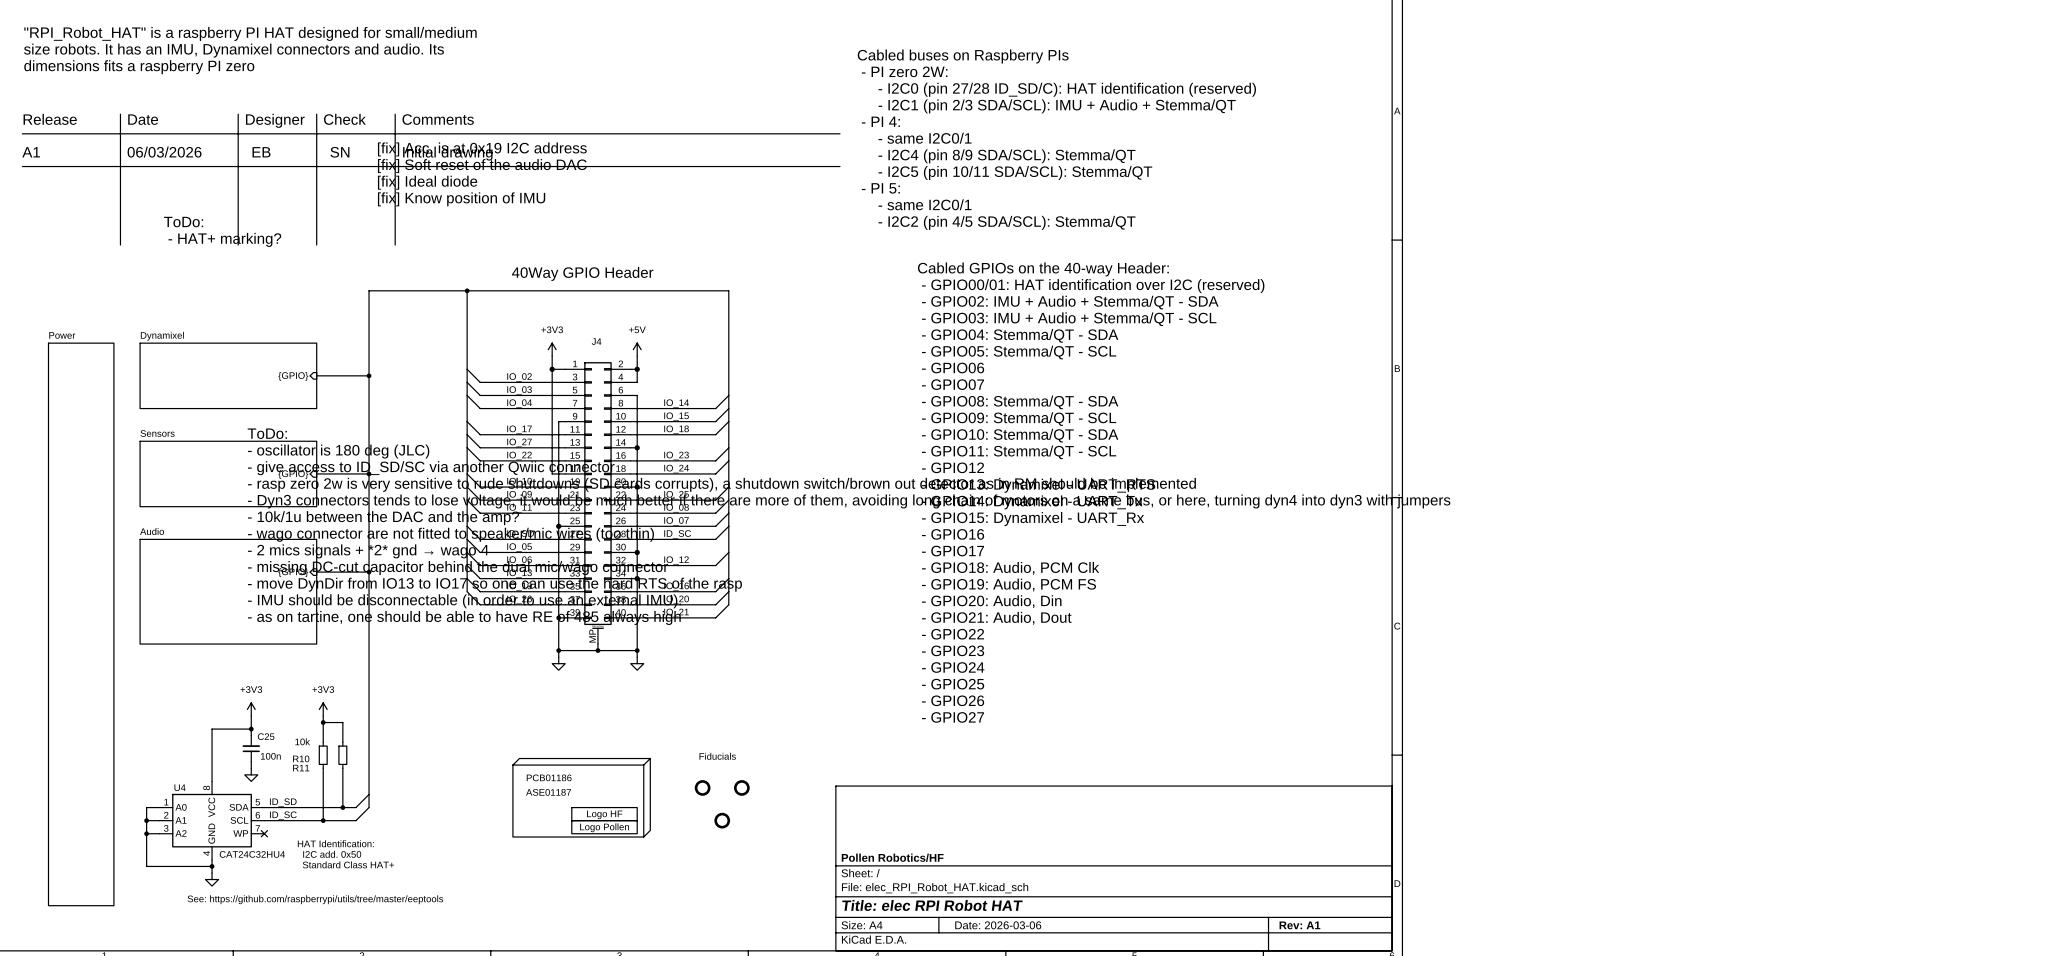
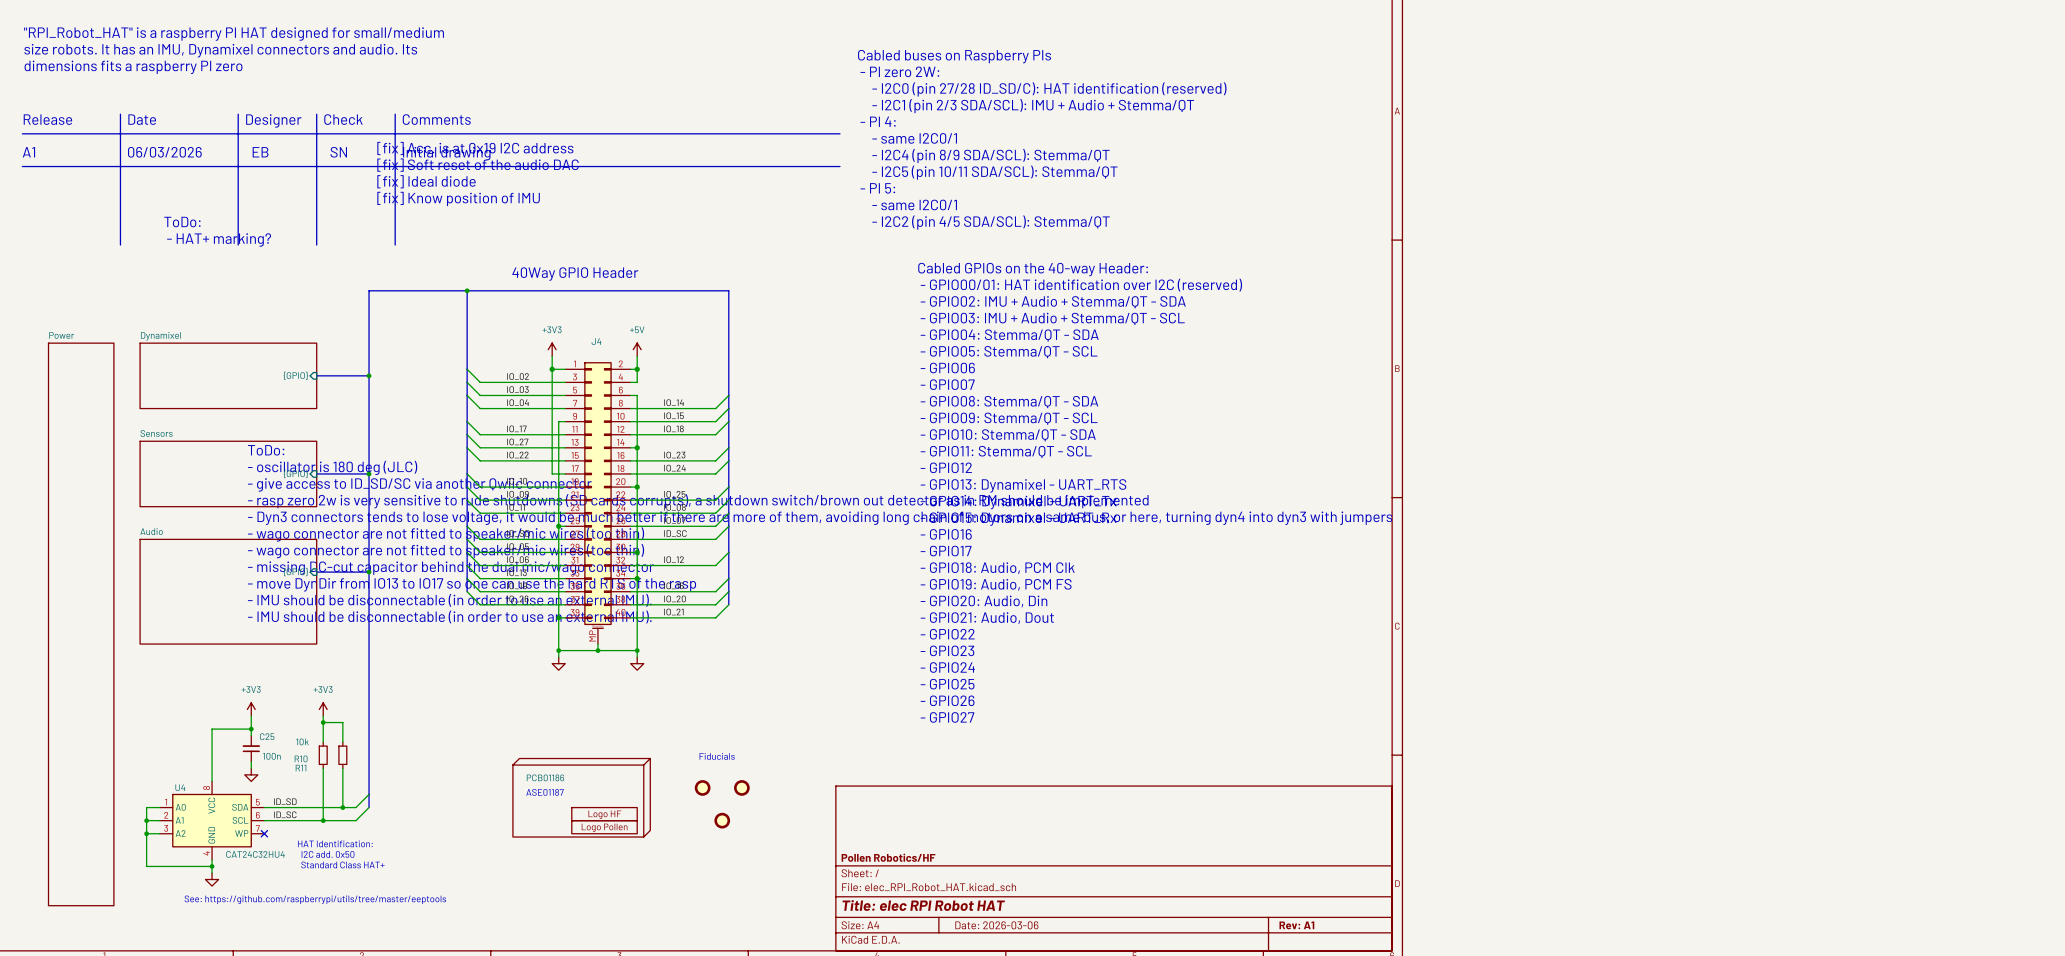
text: ToDo: (267, 433) -> none
text: - oscillator is 180 deg (JLC) (338, 451) -> ToDo: (266, 450)
text: - give access to ID_SD/SC via another Qwiic connector (431, 468) -> - oscillator is 180 deg (JLC) (332, 467)
text: - rasp zero 2w is very sensitive to rude shutdowns (SD cards corrupts), a shutdown switch/brown out detector as in RM should be implemented (721, 484) -> - give access to ID_SD/SC via another Qwiic connector (419, 484)
text: - Dyn3 connectors tends to lose voltage, it would be much better if there are more of them, avoiding long chain of motors on a same bus, or here, turning dyn4 into dyn3 with jumpers (849, 501) -> - rasp zero 2w is very sensitive to rude shutdowns (SD cards corrupts), a shutdown switch/brown out detector as in RM should be implemented (698, 501)
text: - 10k/1u between the DAC and the amp? (383, 518) -> - Dyn3 connectors tends to lose voltage, it would be much better if there are more of them, avoiding long chain of motors on a same bus, or here, turning dyn4 into dyn3 with jumpers (820, 518)
text: - 2 mics signals + *2* gnd → wago 4 (368, 551) -> - wago connector are not fitted to speaker/mic wires (too thin) (446, 551)
text: - as on tartine, one should be able to have RE of 485 always high (464, 617) -> - IMU should be disconnectable (in order to use an external IMU). (449, 617)

